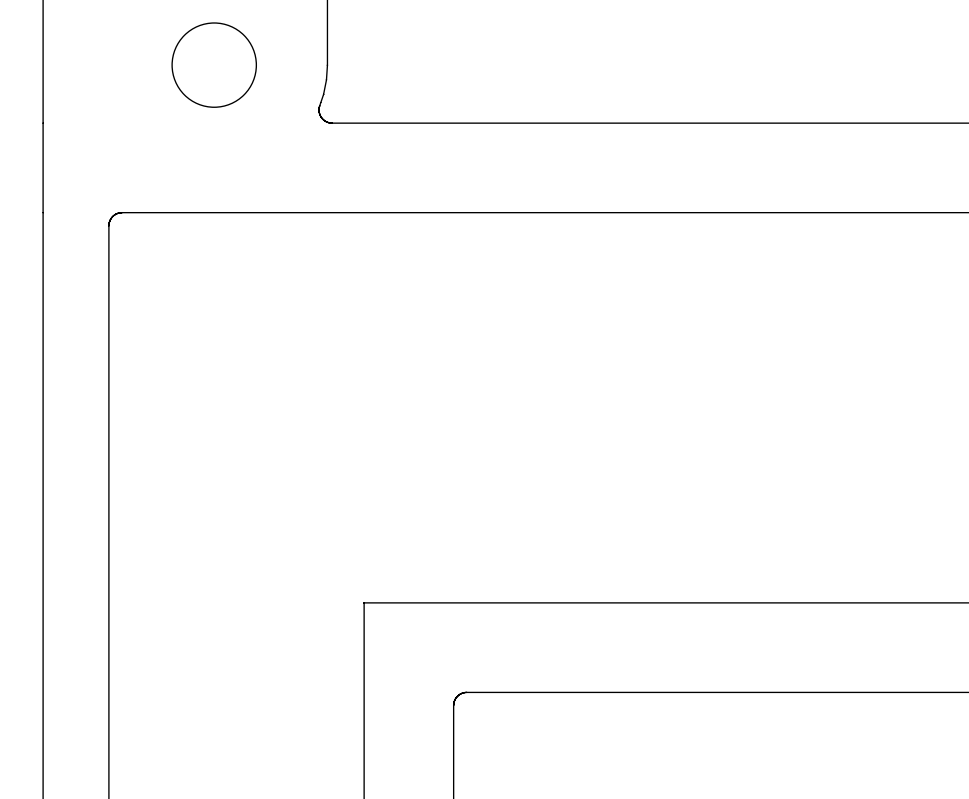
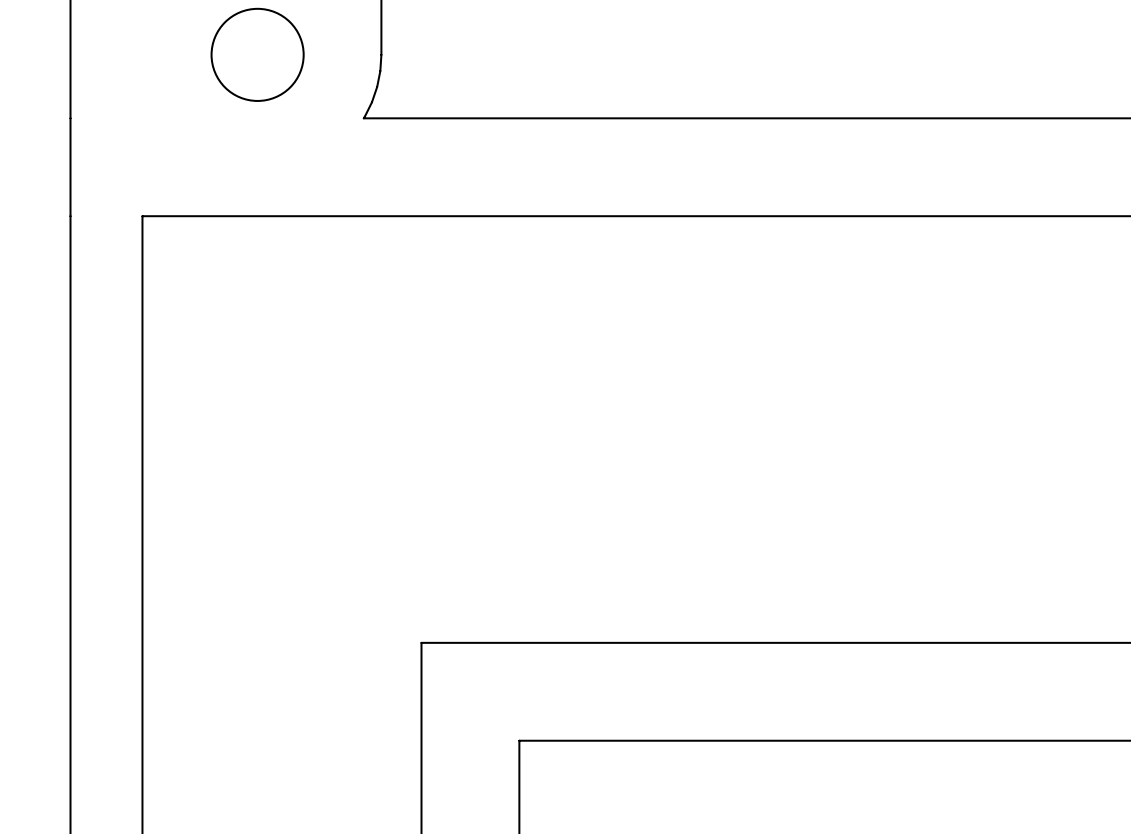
board edge: none -> (372, 99) (363, 118) (386, 118)
board edge: none -> (156, 216) (142, 216) (142, 230)
board edge: none -> (533, 740) (519, 740) (519, 755)

